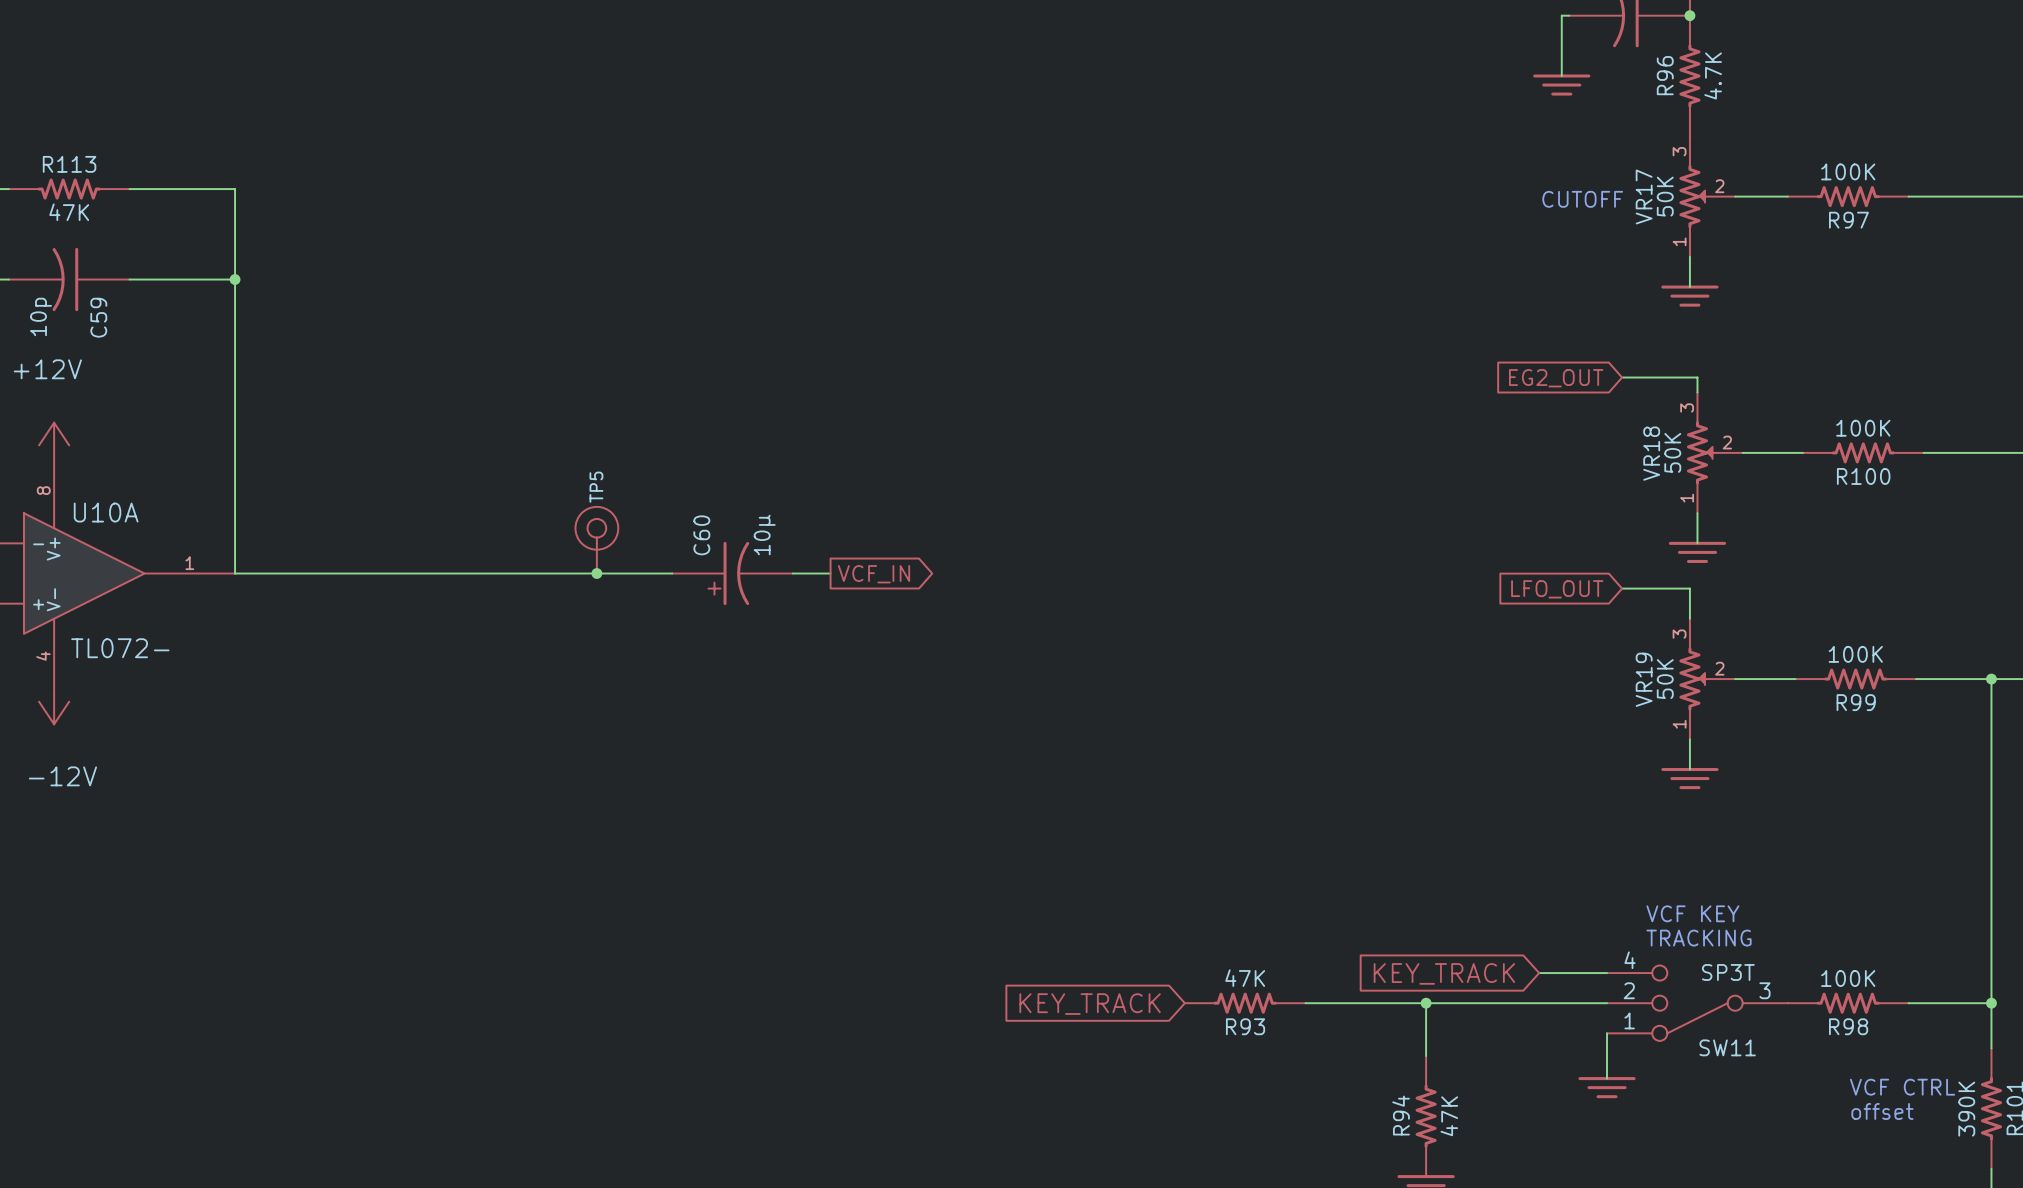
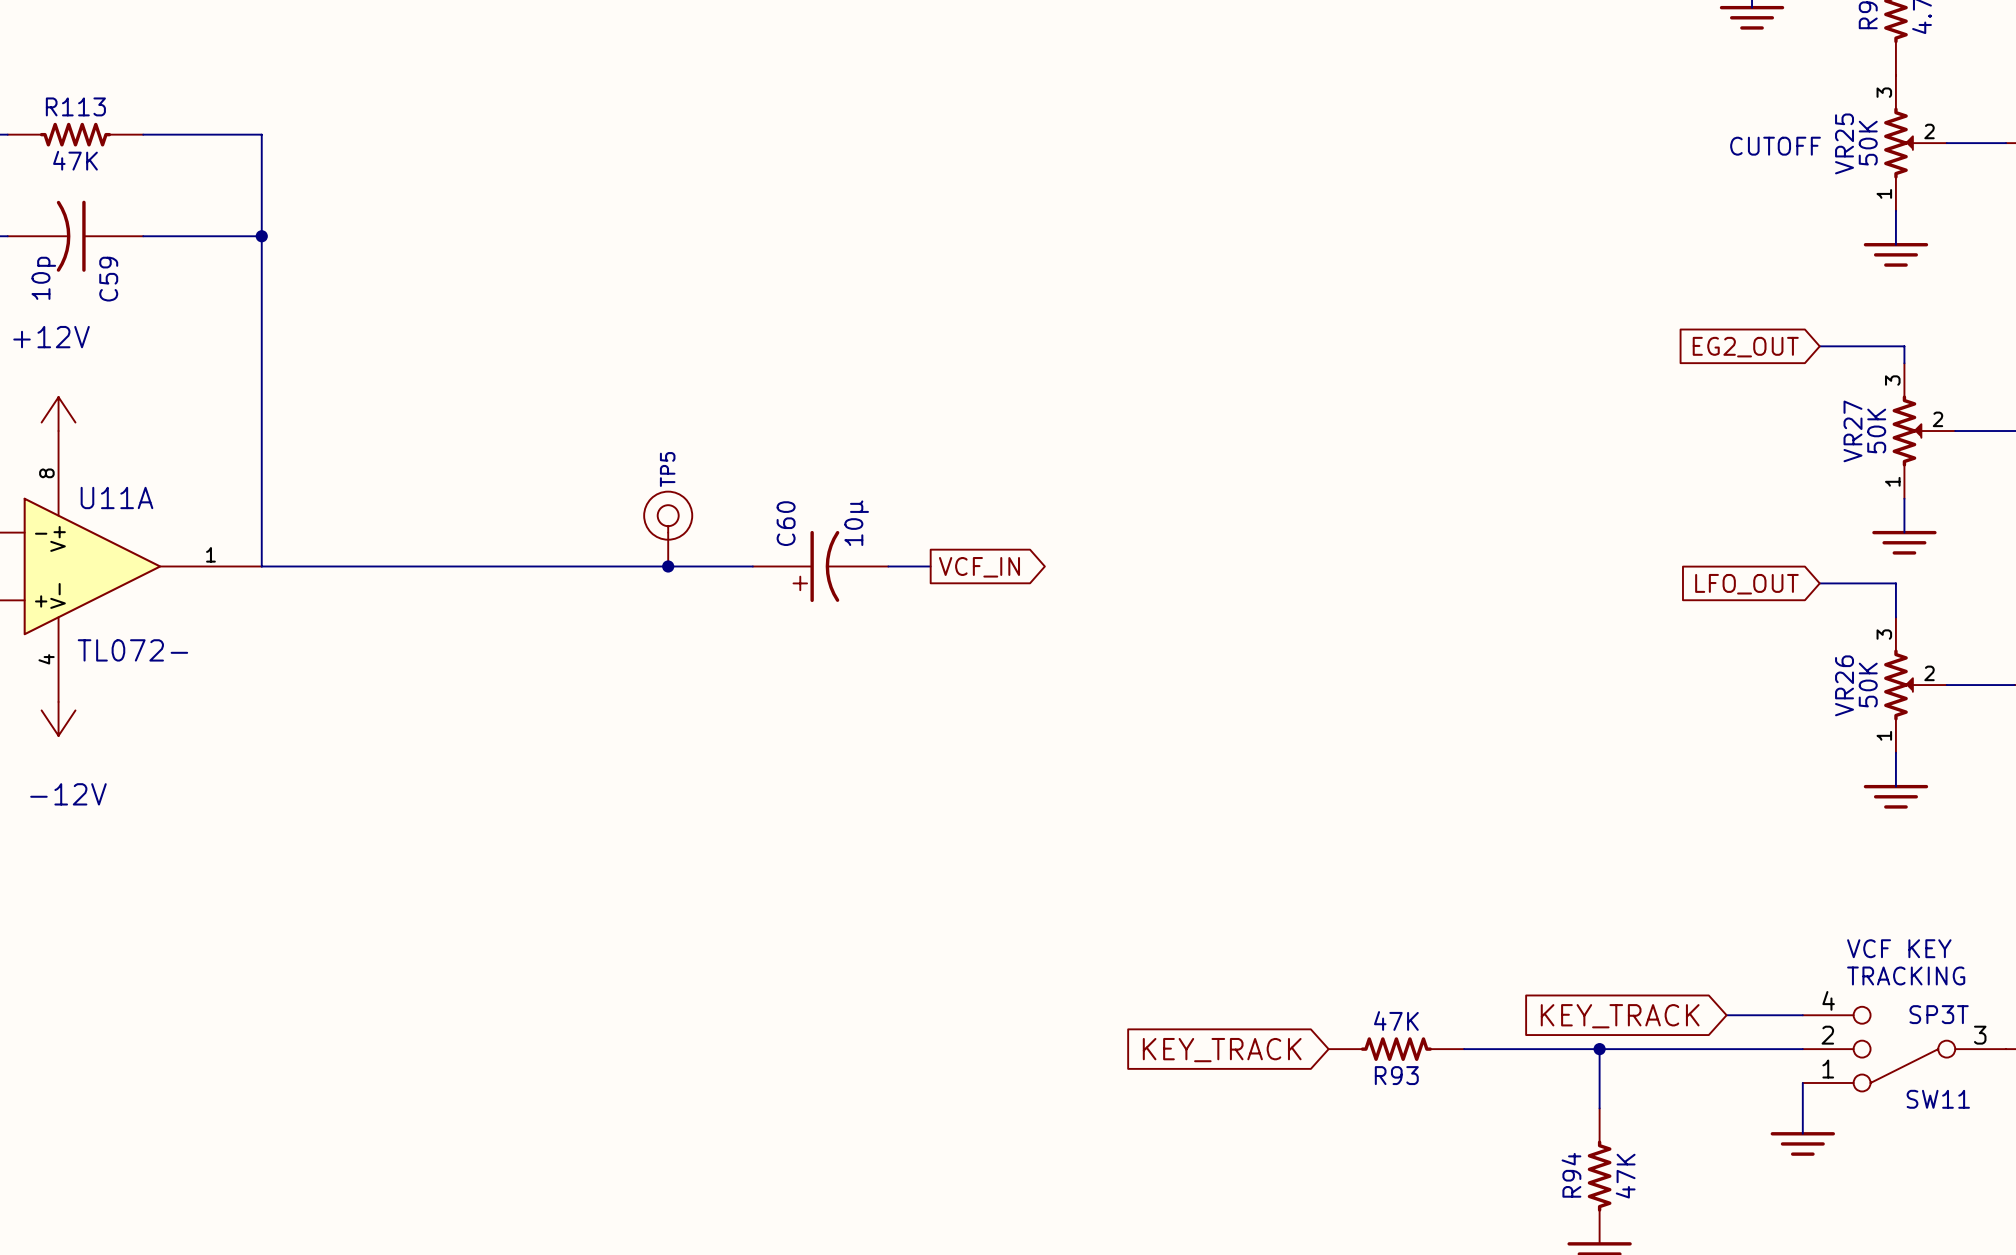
VR17 name: VR17 (1644, 196) -> VR25 (1844, 143)
VR18 name: VR18 (1651, 453) -> VR27 (1852, 431)
U10A name: U10A (106, 512) -> U11A (116, 497)
VR19 name: VR19 (1644, 679) -> VR26 (1844, 685)

